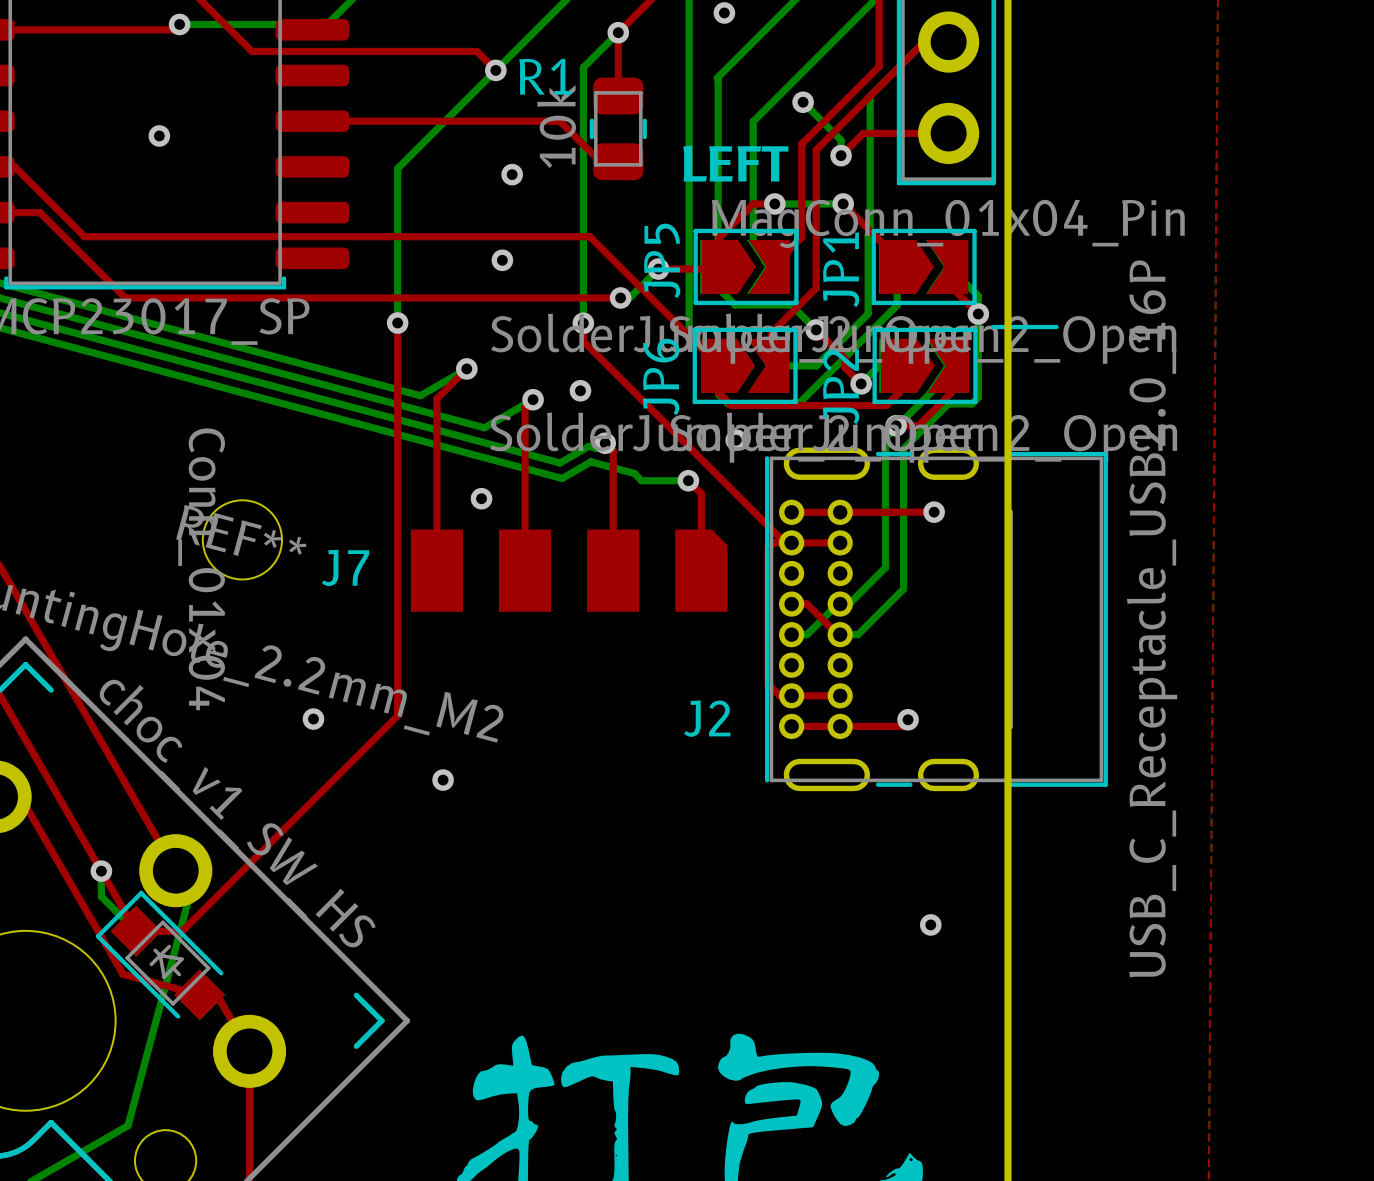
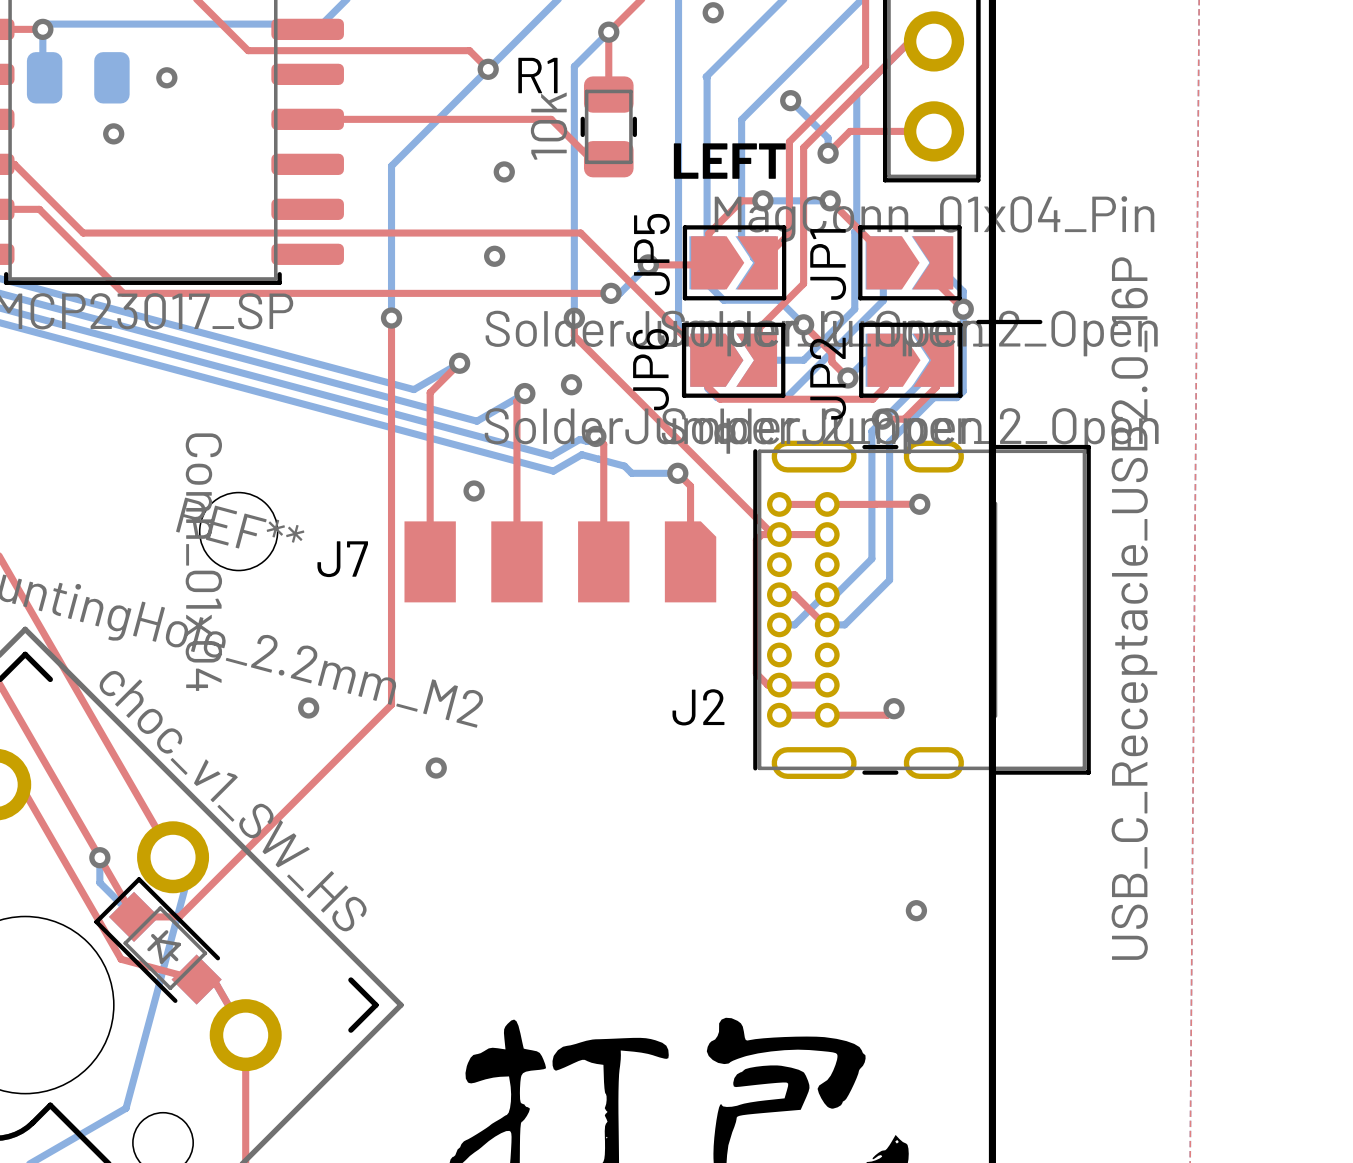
bottom track: none -> (176, 24) (48, 24) (42, 29) (42, 76) (44, 77)
top track: (179, 24) (174, 29) (43, 29) -> none
via: (179, 24) -> none
via: none -> (42, 29)
part: none -> (78, 77)
via: none -> (166, 77)
via: none -> (113, 133)
via: (159, 135) -> none

